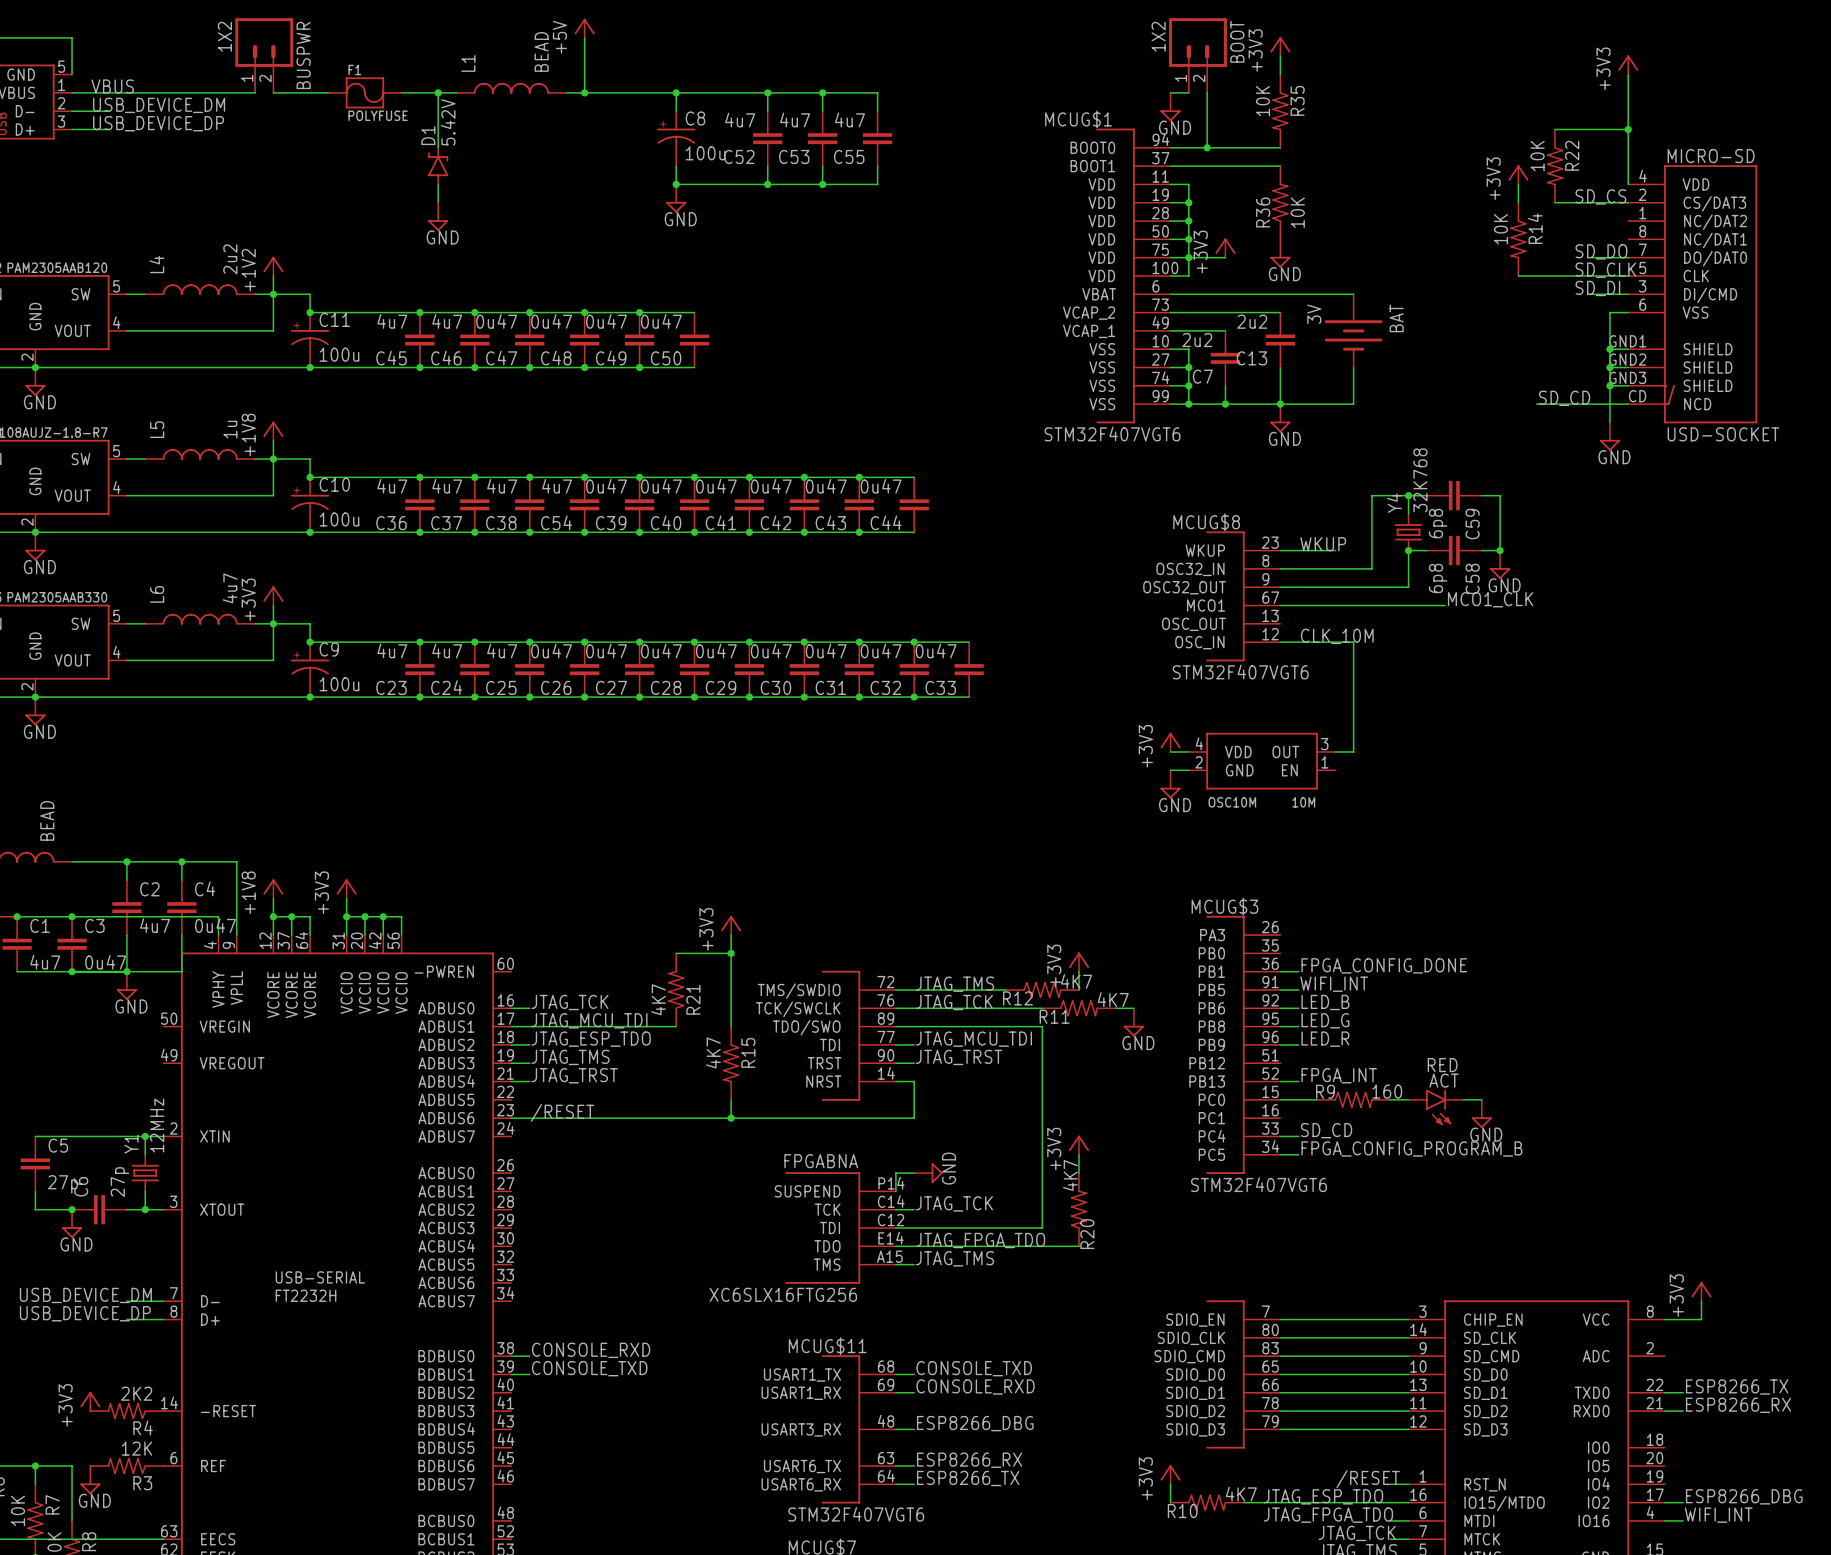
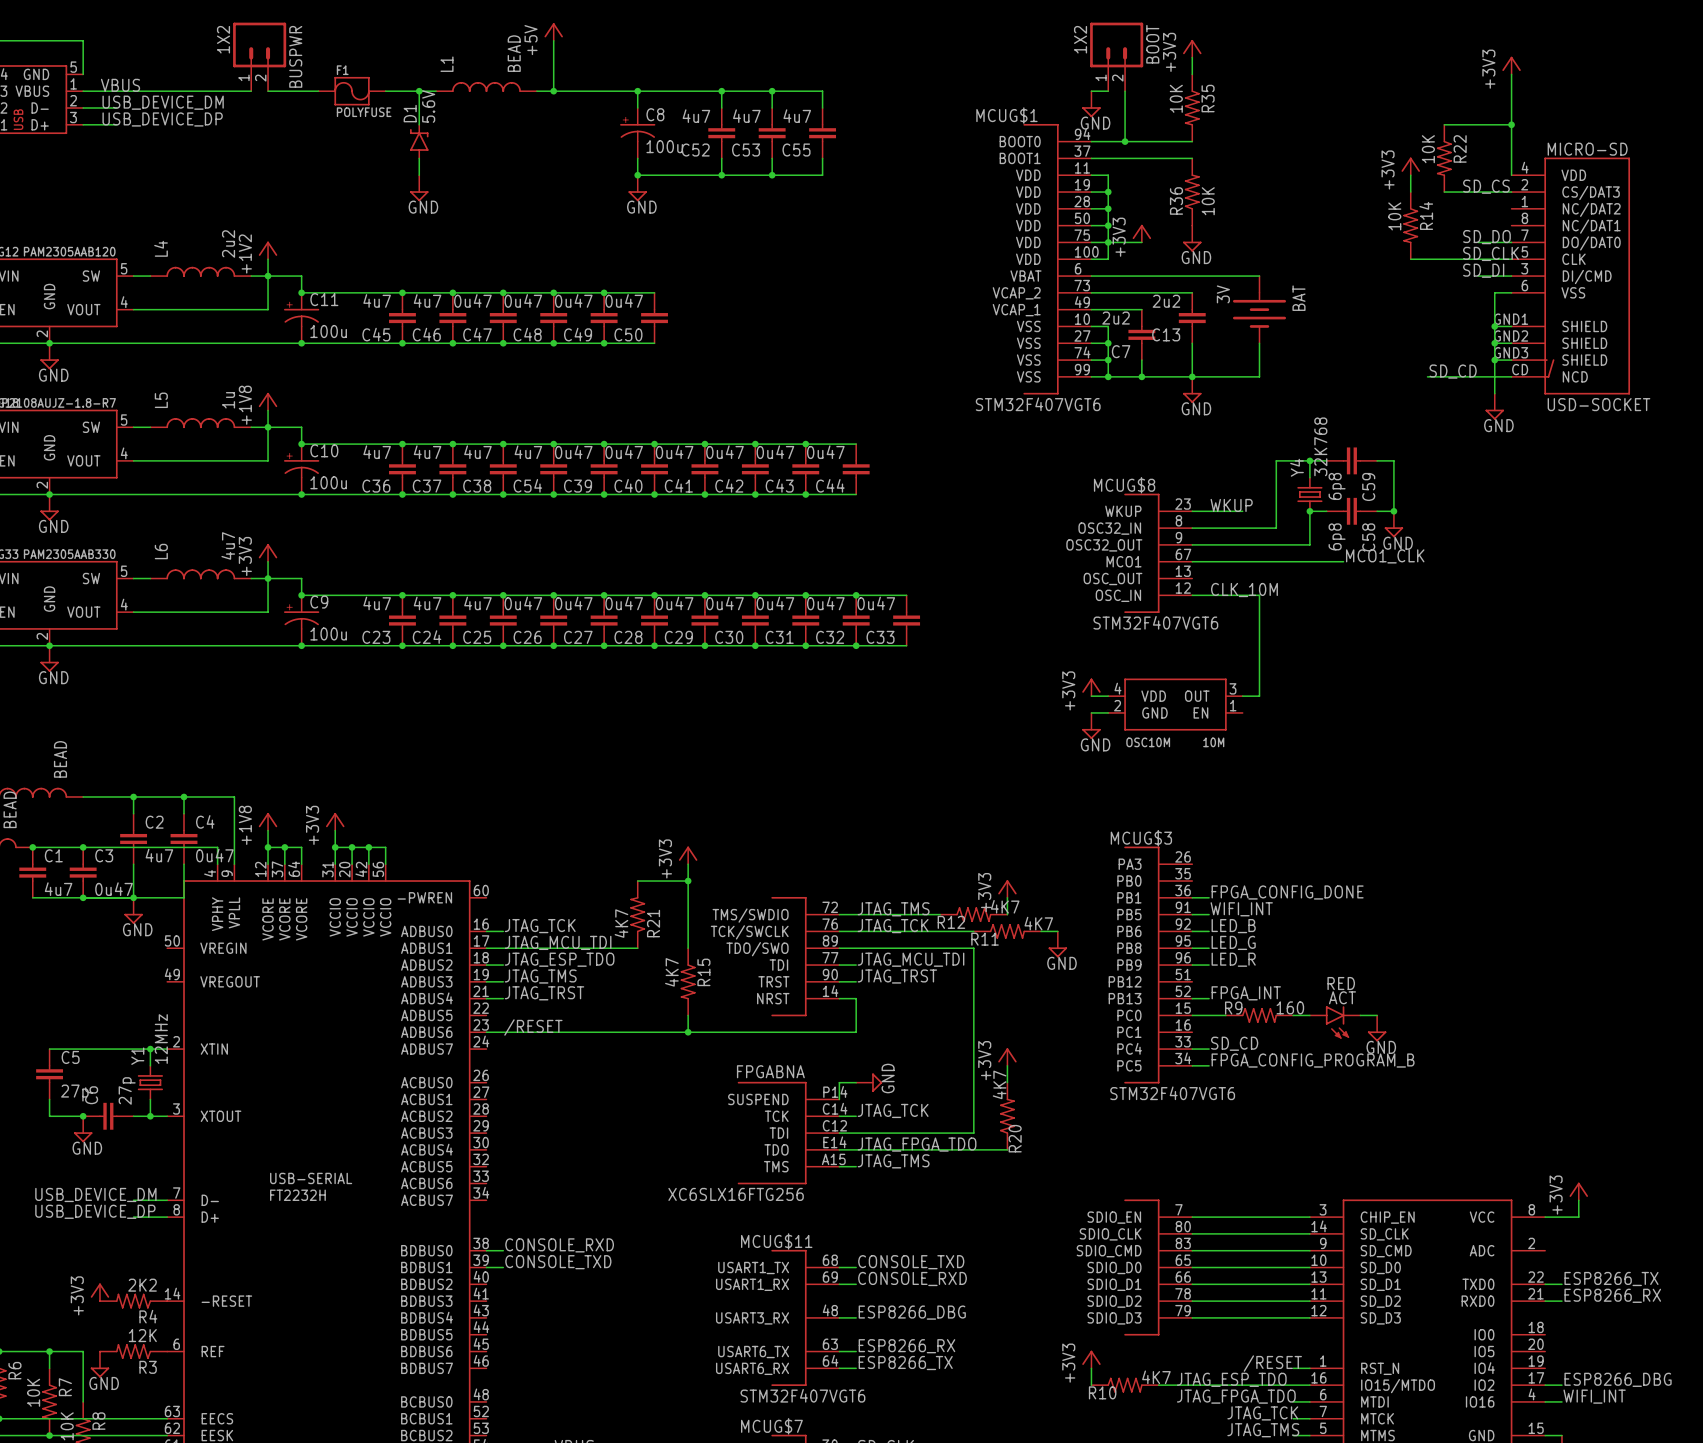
D1 value: 5.42V (448, 122) -> 5.6V (428, 106)
D1 position: (438, 166) -> (419, 141)
power symbol position: GND (438, 216) -> GND (419, 188)

